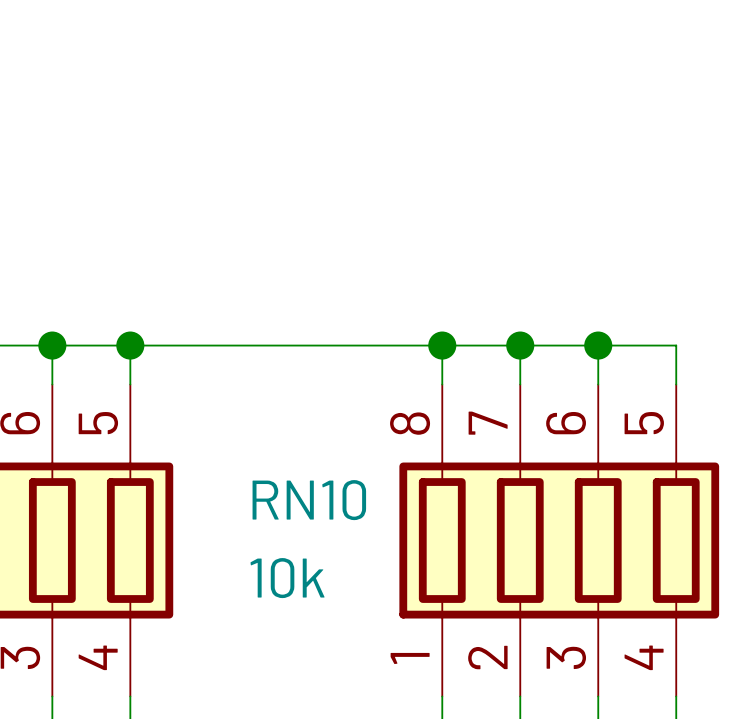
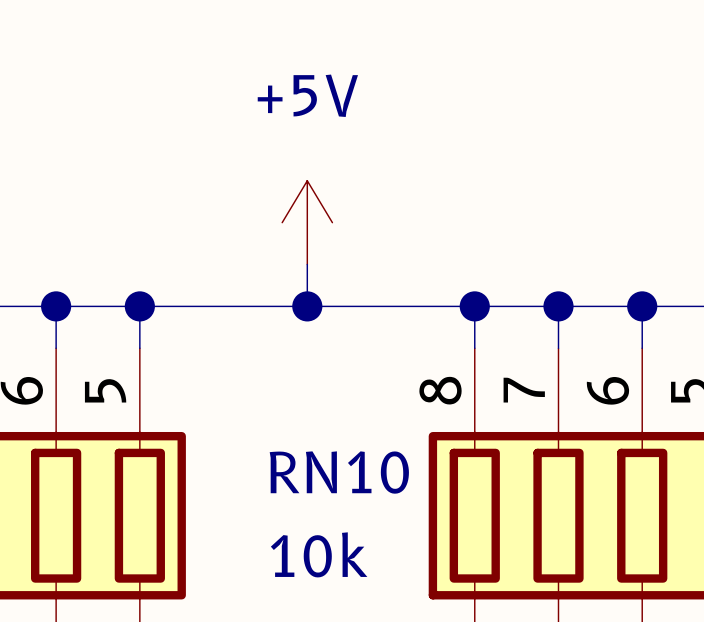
power symbol: none -> +5V (307, 222)
wire: none -> (307, 264) (307, 306)
junction: none -> (307, 306)

